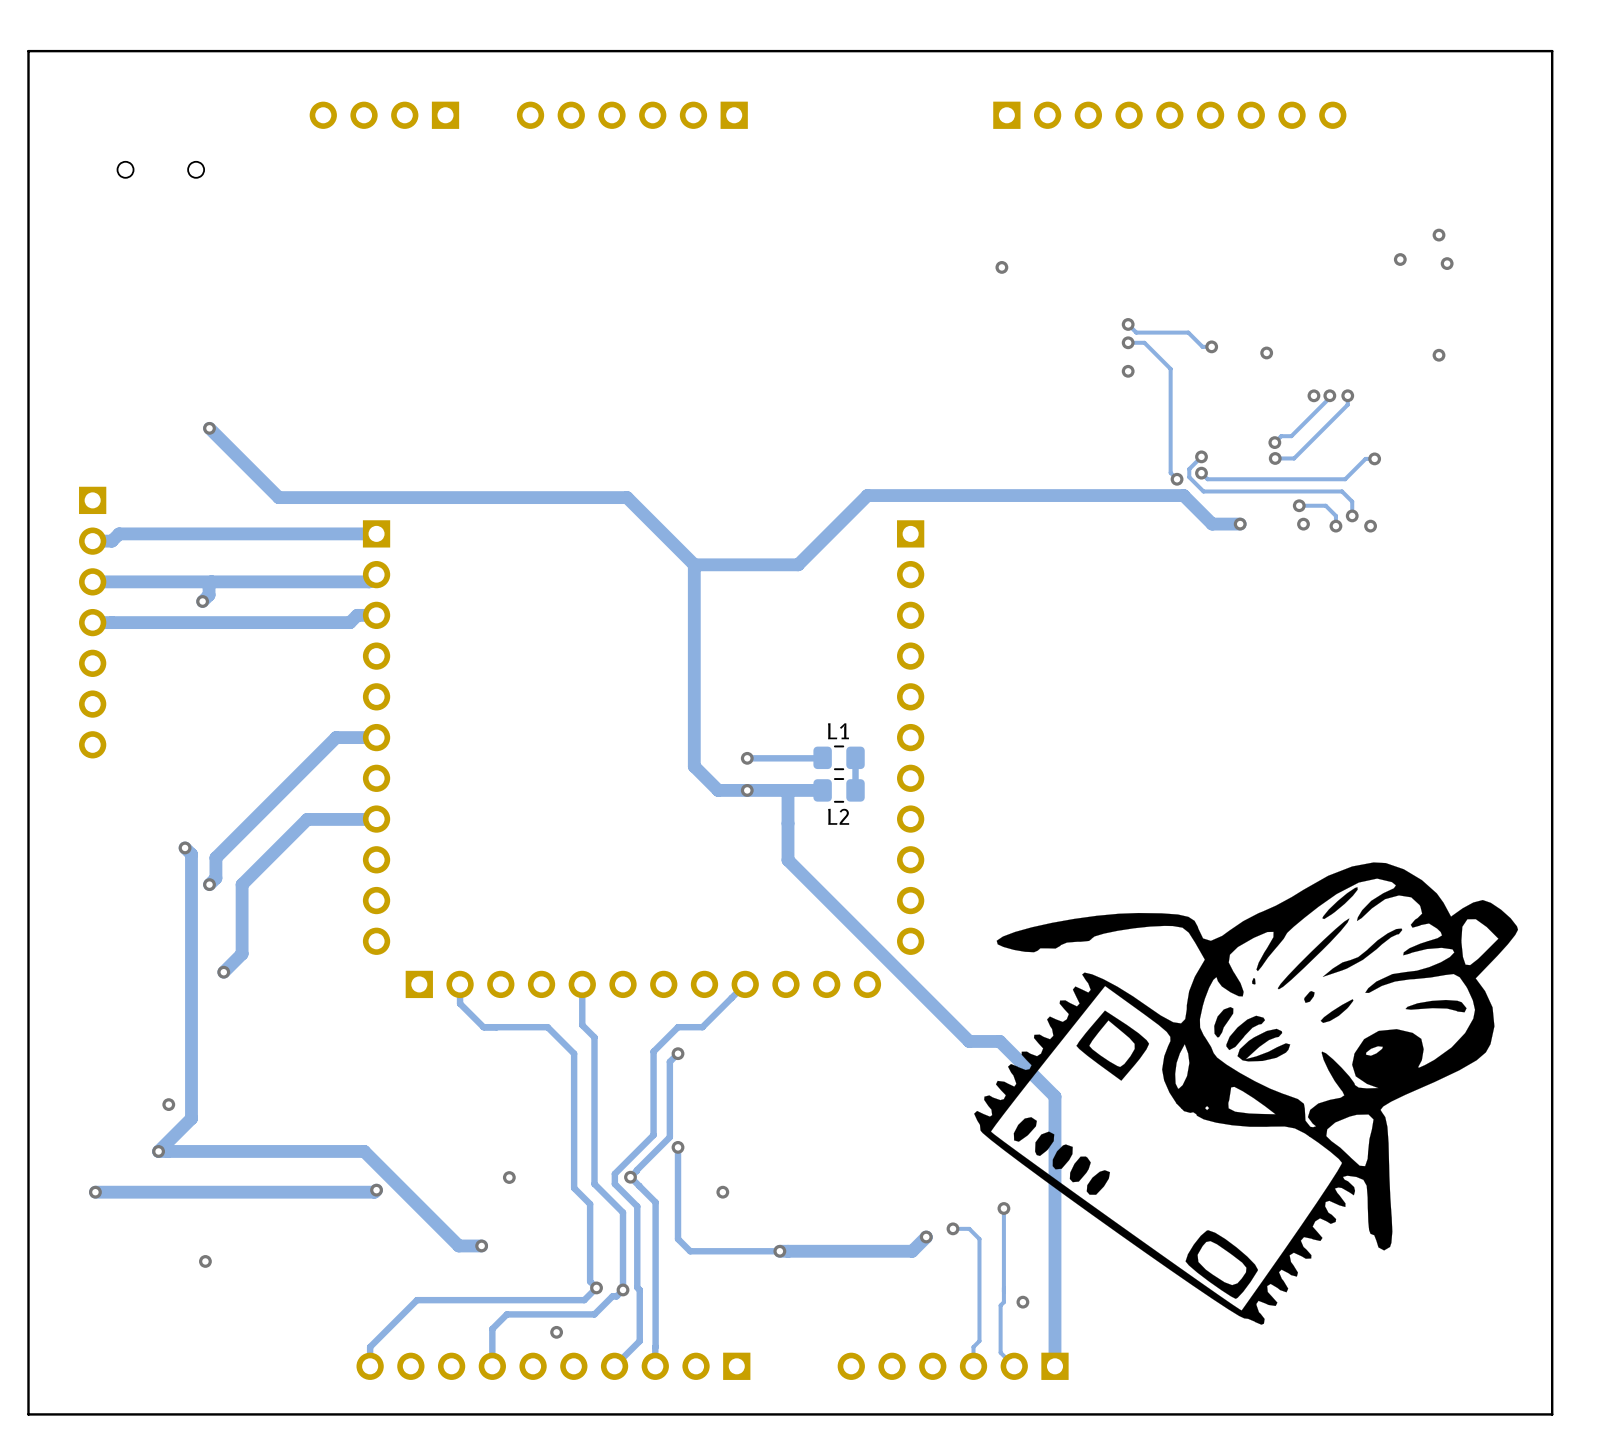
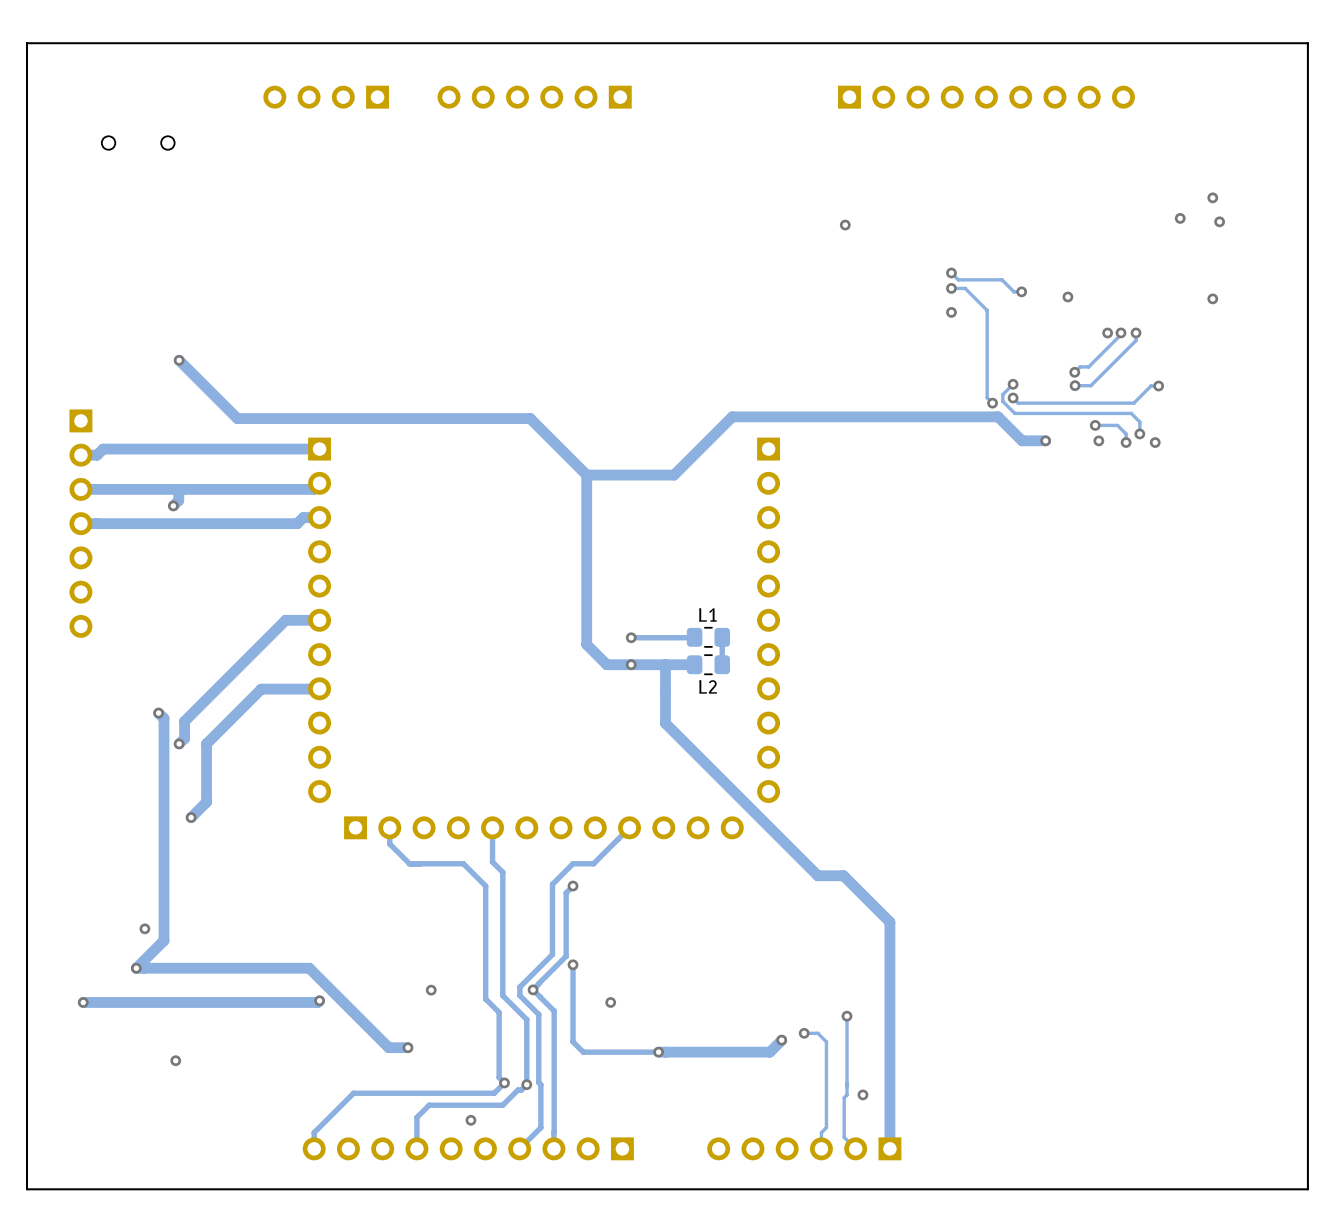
drawing: [974, 862, 1519, 1325] -> none

